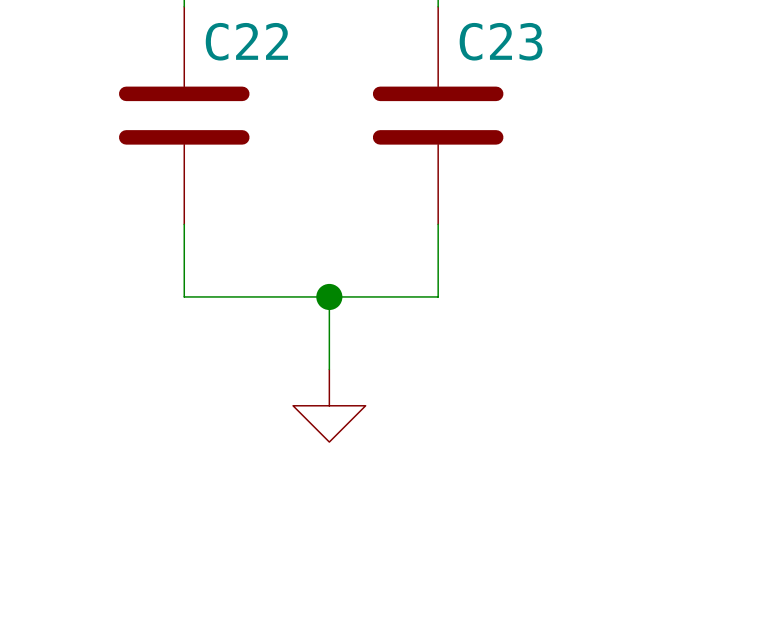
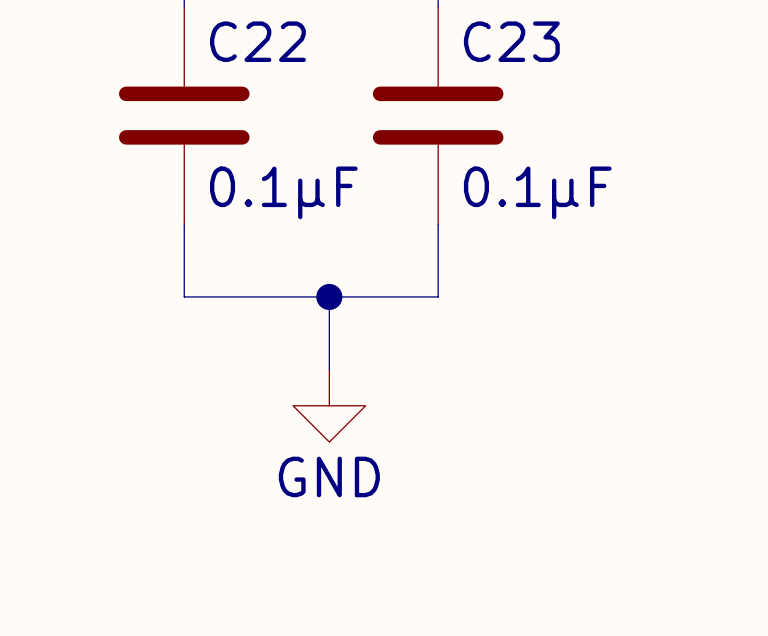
C22 value: none -> 0.1µF (283, 192)
C23 value: none -> 0.1µF (537, 192)
power symbol text: none -> GND (329, 476)

